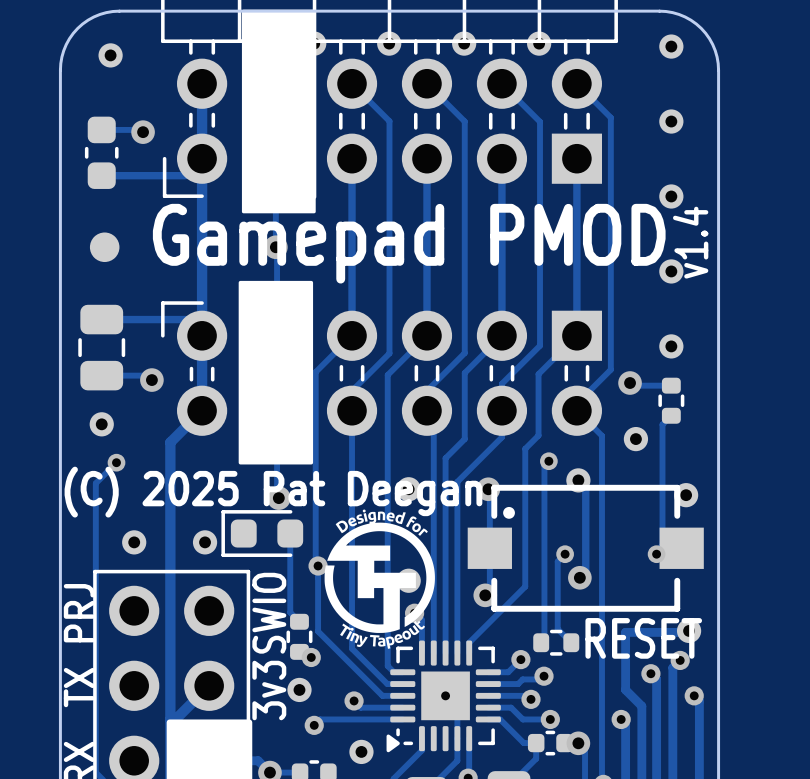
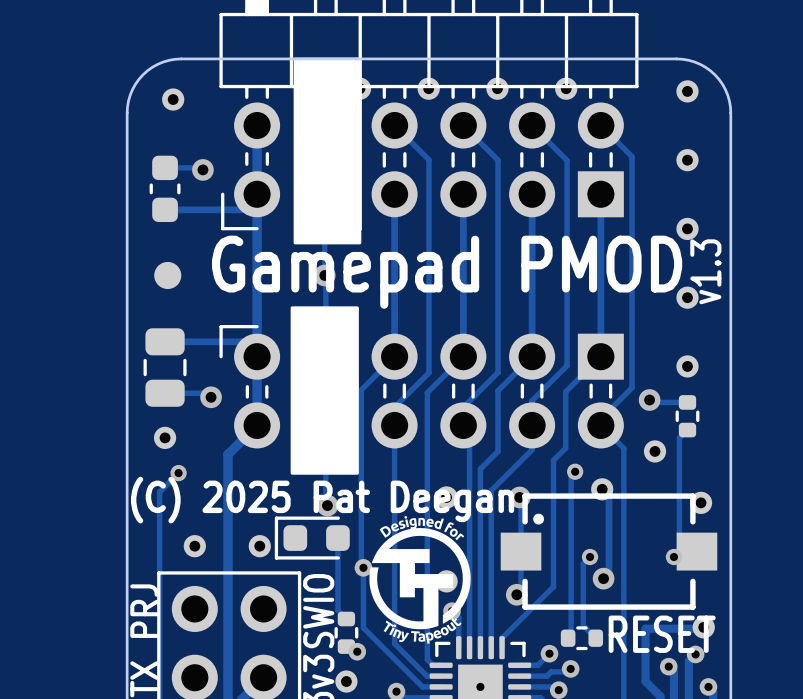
text: v1.4 (690, 242) -> v1.3 (705, 271)

